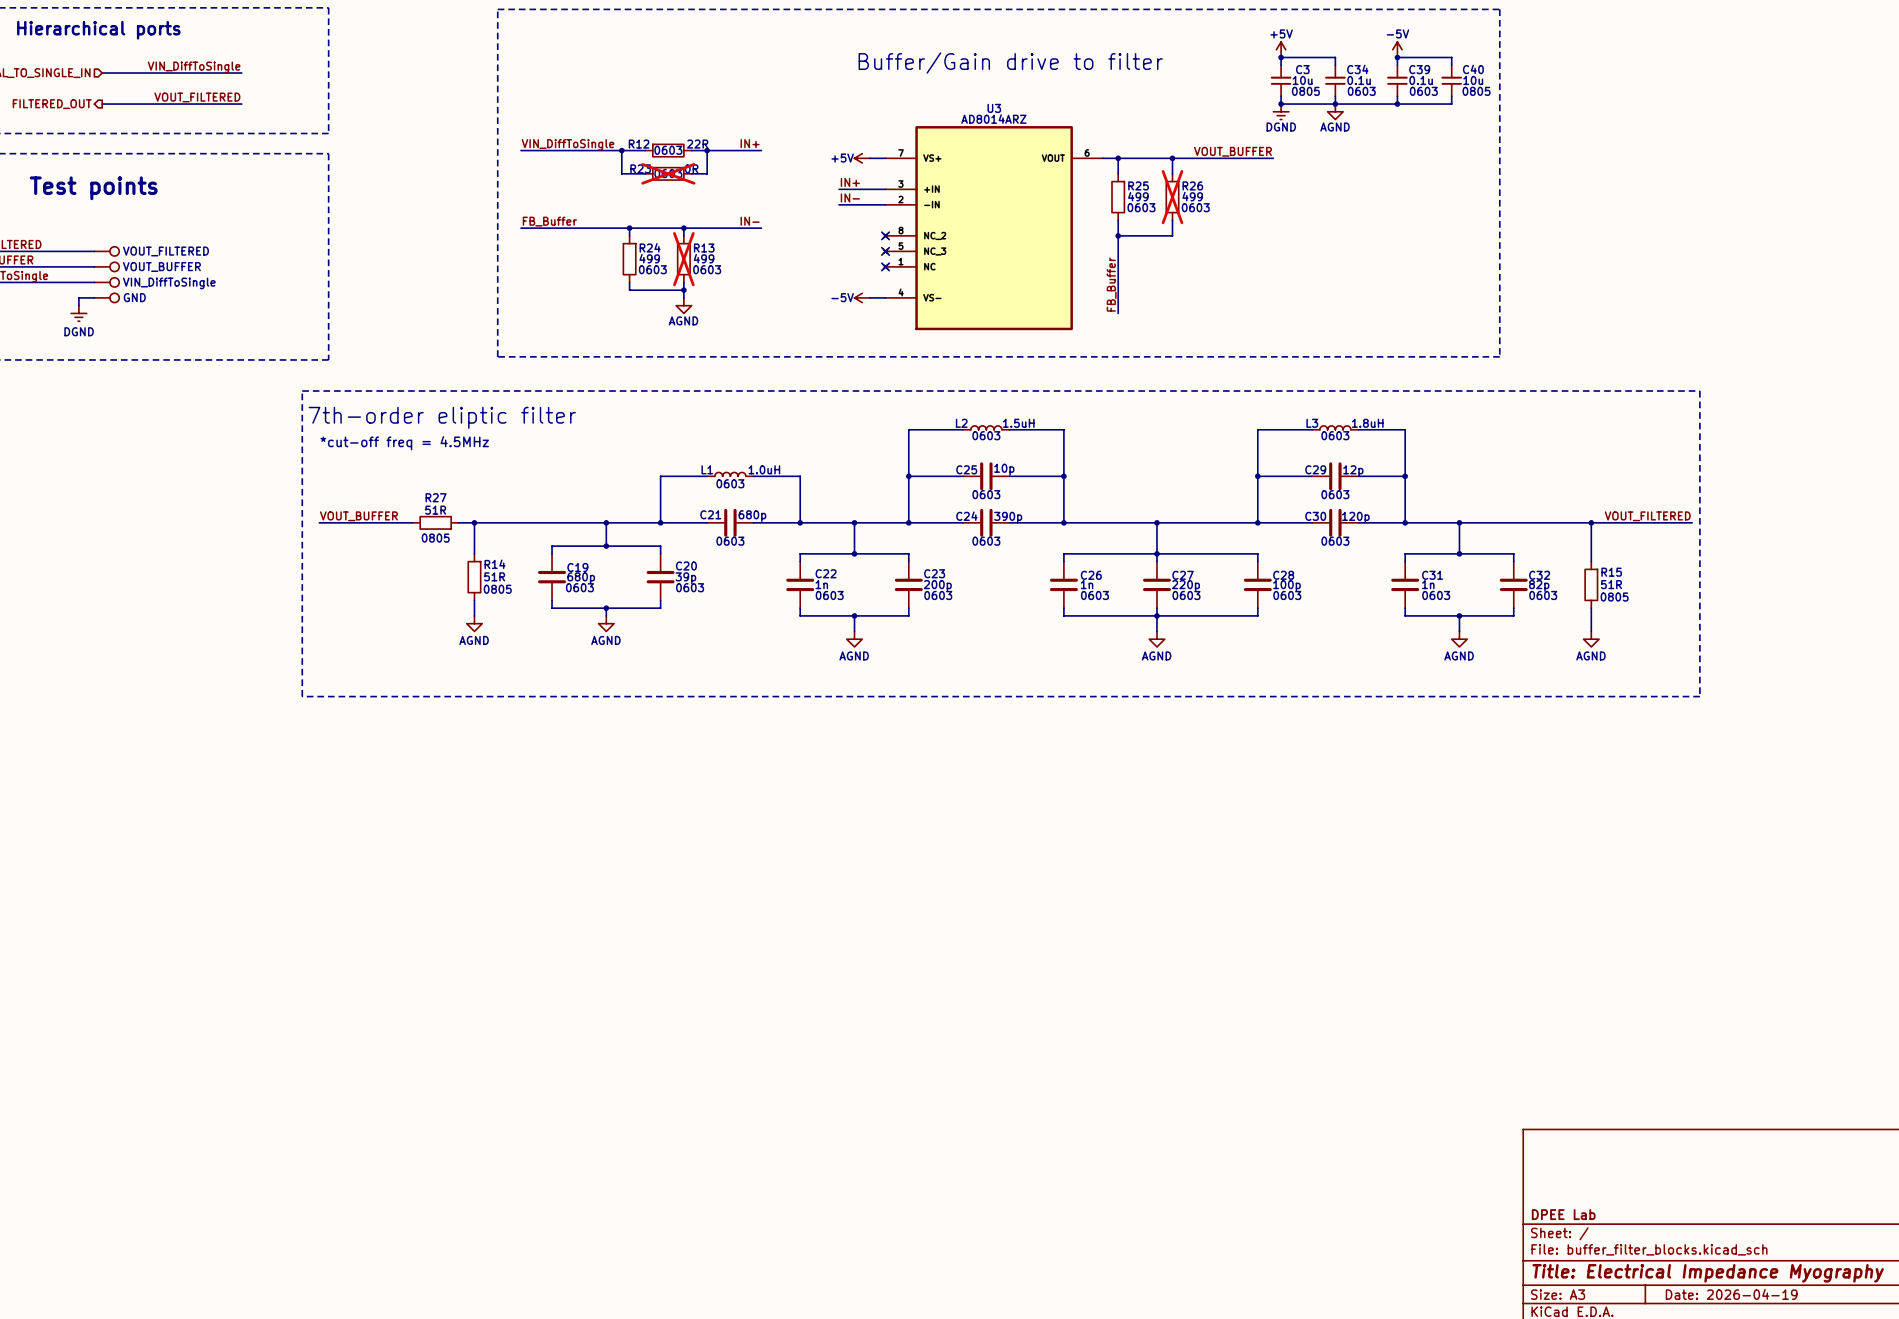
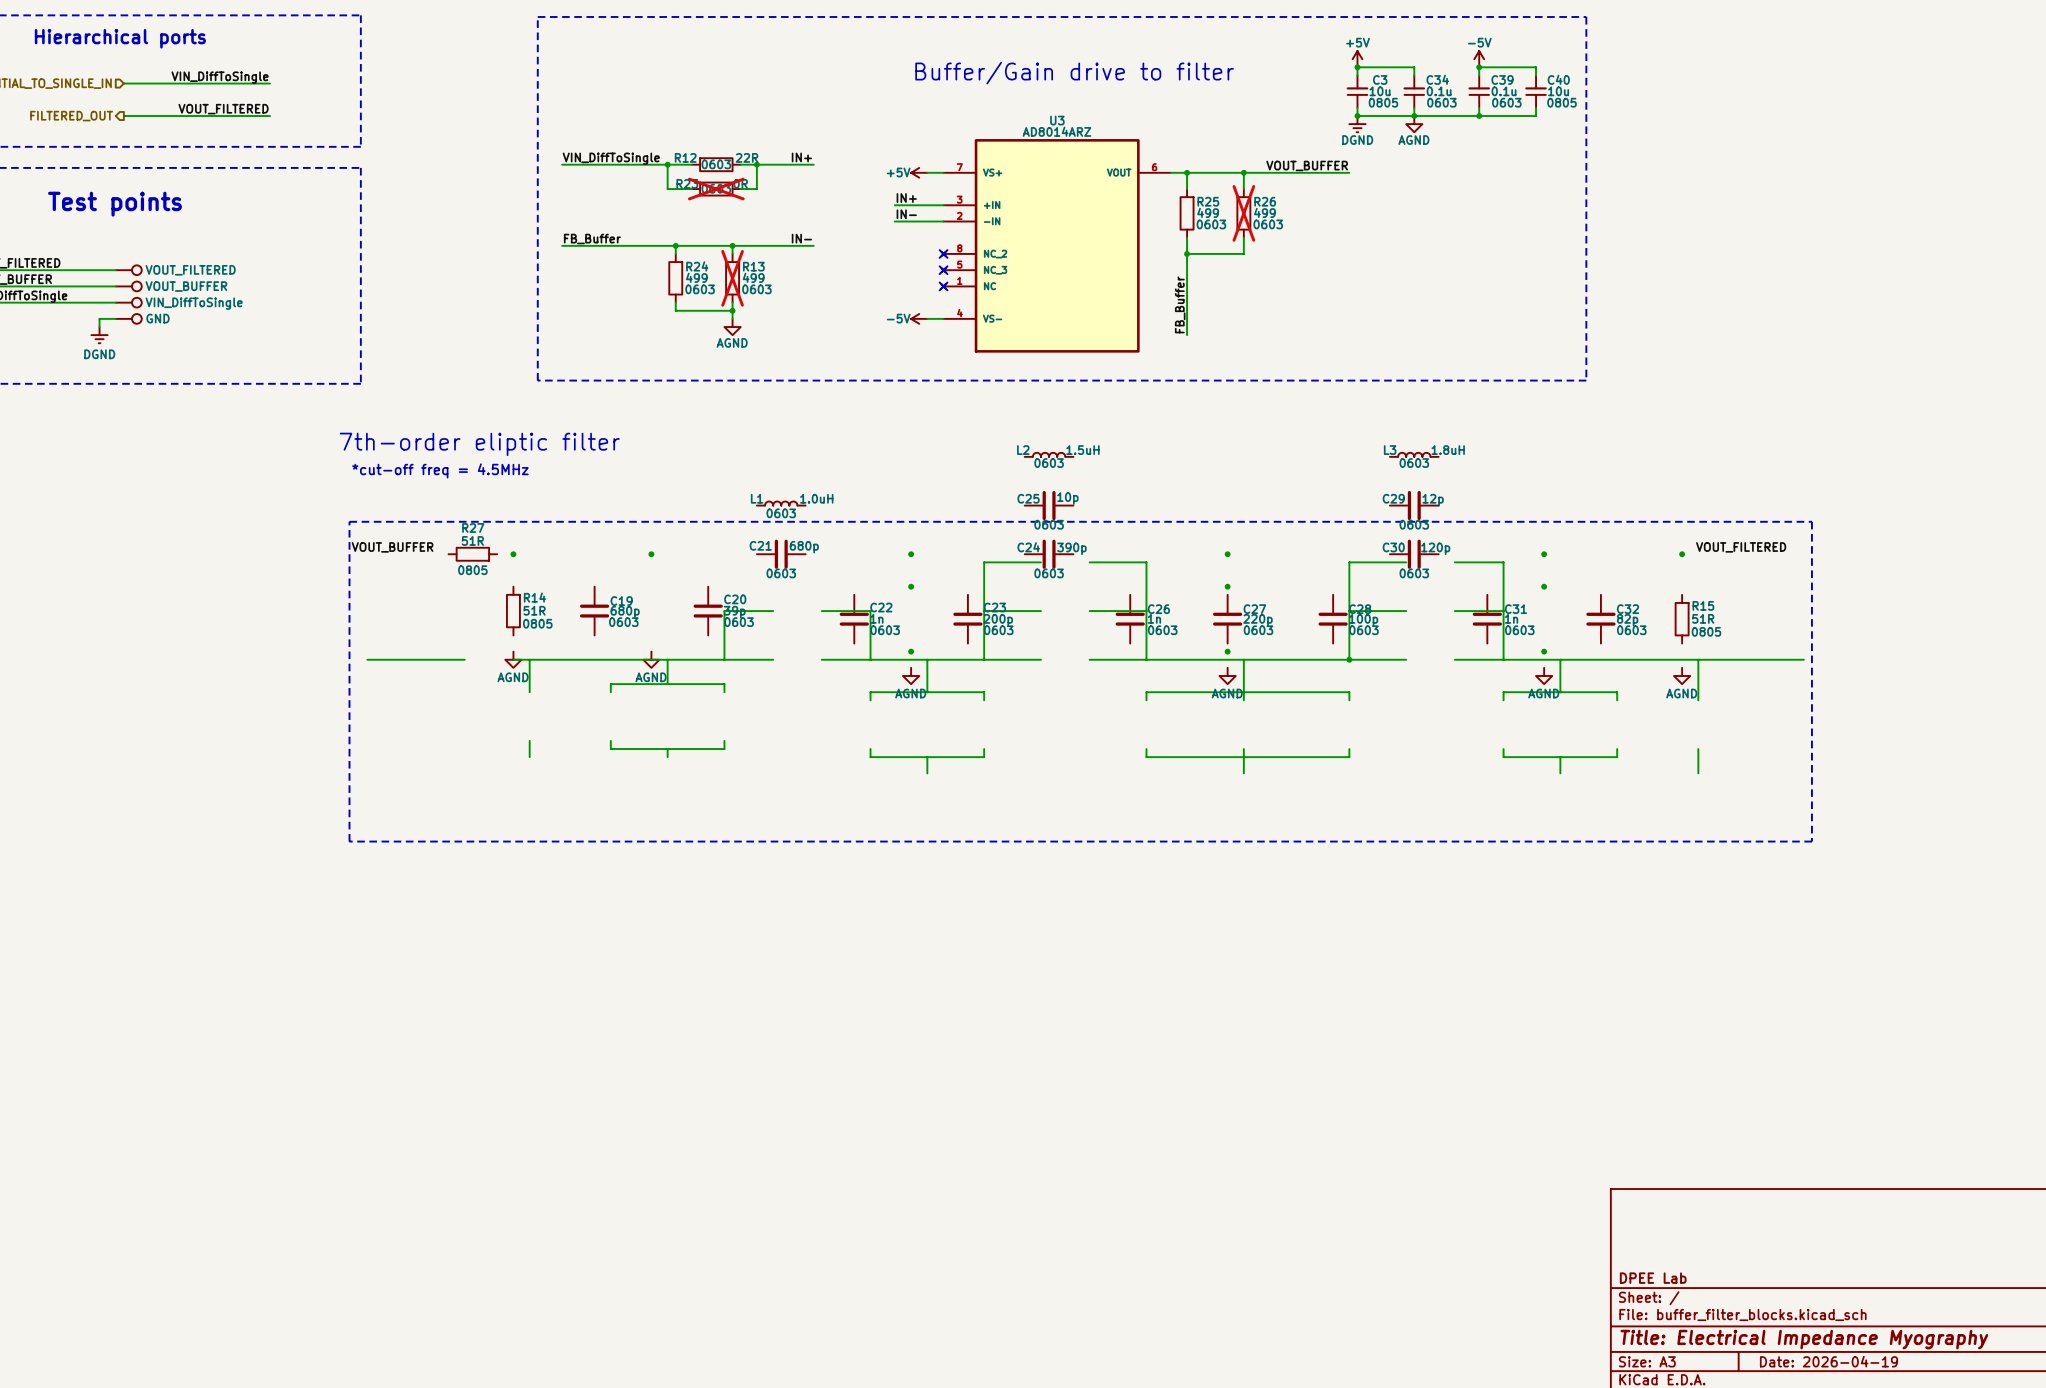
line: (302, 391) (1699, 391) (1699, 696) (302, 696) (302, 391) -> (349, 521) (1811, 521) (1811, 841) (349, 841) (349, 521)
wire: (963, 429) (908, 429) (908, 522) -> (1040, 562) (984, 562) (984, 659)
wire: (1009, 429) (1063, 429) (1063, 522) -> (1089, 562) (1146, 562) (1146, 659)
wire: (1312, 429) (1257, 429) (1257, 522) -> (1406, 562) (1349, 562) (1349, 659)
wire: (1358, 429) (1405, 429) (1405, 522) -> (1454, 562) (1503, 562) (1503, 659)
wire: (707, 476) (660, 476) (660, 522) -> (773, 611) (724, 611) (724, 659)
wire: (753, 476) (800, 476) (800, 522) -> (821, 611) (870, 611) (870, 659)
wire: (908, 476) (963, 476) -> (984, 611) (1040, 611)
junction: (908, 476) -> none
wire: (1009, 476) (1063, 476) -> (1089, 611) (1146, 611)
junction: (1063, 476) -> none
wire: (1257, 476) (1312, 476) -> (1349, 611) (1406, 611)
junction: (1257, 476) -> none
wire: (1358, 476) (1405, 476) -> (1454, 611) (1503, 611)
junction: (1405, 476) -> none
wire: (319, 522) (412, 522) -> (367, 659) (464, 659)
wire: (458, 522) (707, 522) -> (513, 659) (773, 659)
wire: (474, 522) (474, 553) -> (529, 659) (529, 692)
wire: (606, 522) (606, 546) -> (667, 659) (667, 684)
junction: (660, 522) -> none
wire: (753, 522) (963, 522) -> (821, 659) (1040, 659)
junction: (800, 522) -> none
wire: (854, 522) (854, 553) -> (927, 659) (927, 692)
junction: (908, 522) -> none
wire: (1009, 522) (1312, 522) -> (1089, 659) (1406, 659)
junction: (1063, 522) -> none
wire: (1156, 522) (1156, 561) -> (1243, 659) (1243, 700)
junction: (1257, 522) -> none
wire: (1358, 522) (1692, 522) -> (1454, 659) (1803, 659)
junction: (1405, 522) -> none
wire: (1459, 522) (1459, 553) -> (1560, 659) (1560, 692)
wire: (1591, 522) (1591, 561) -> (1698, 659) (1698, 700)
junction: (606, 546) -> none
wire: (552, 553) (552, 546) (660, 546) (660, 553) -> (610, 692) (610, 684) (724, 684) (724, 692)
wire: (800, 561) (800, 553) (908, 553) (908, 561) -> (870, 700) (870, 692) (984, 692) (984, 700)
wire: (1063, 561) (1063, 553) (1257, 553) (1257, 561) -> (1146, 700) (1146, 692) (1349, 692) (1349, 700)
wire: (1405, 561) (1405, 553) (1513, 553) (1513, 561) -> (1503, 700) (1503, 692) (1617, 692) (1617, 700)
wire: (474, 600) (474, 615) -> (529, 740) (529, 757)
wire: (552, 600) (552, 608) (660, 608) (660, 600) -> (610, 740) (610, 749) (724, 749) (724, 740)
wire: (606, 608) (606, 615) -> (667, 749) (667, 757)
junction: (606, 608) -> none
wire: (800, 608) (800, 615) (908, 615) (908, 608) -> (870, 749) (870, 757) (984, 757) (984, 749)
wire: (1063, 608) (1063, 615) (1257, 615) (1257, 608) -> (1146, 749) (1146, 757) (1349, 757) (1349, 749)
wire: (1156, 608) (1156, 631) -> (1243, 749) (1243, 773)
wire: (1405, 608) (1405, 615) (1513, 615) (1513, 608) -> (1503, 749) (1503, 757) (1617, 757) (1617, 749)
wire: (1591, 608) (1591, 631) -> (1698, 749) (1698, 773)
wire: (854, 615) (854, 631) -> (927, 757) (927, 773)
wire: (1459, 615) (1459, 631) -> (1560, 757) (1560, 773)
junction: none -> (1349, 659)

